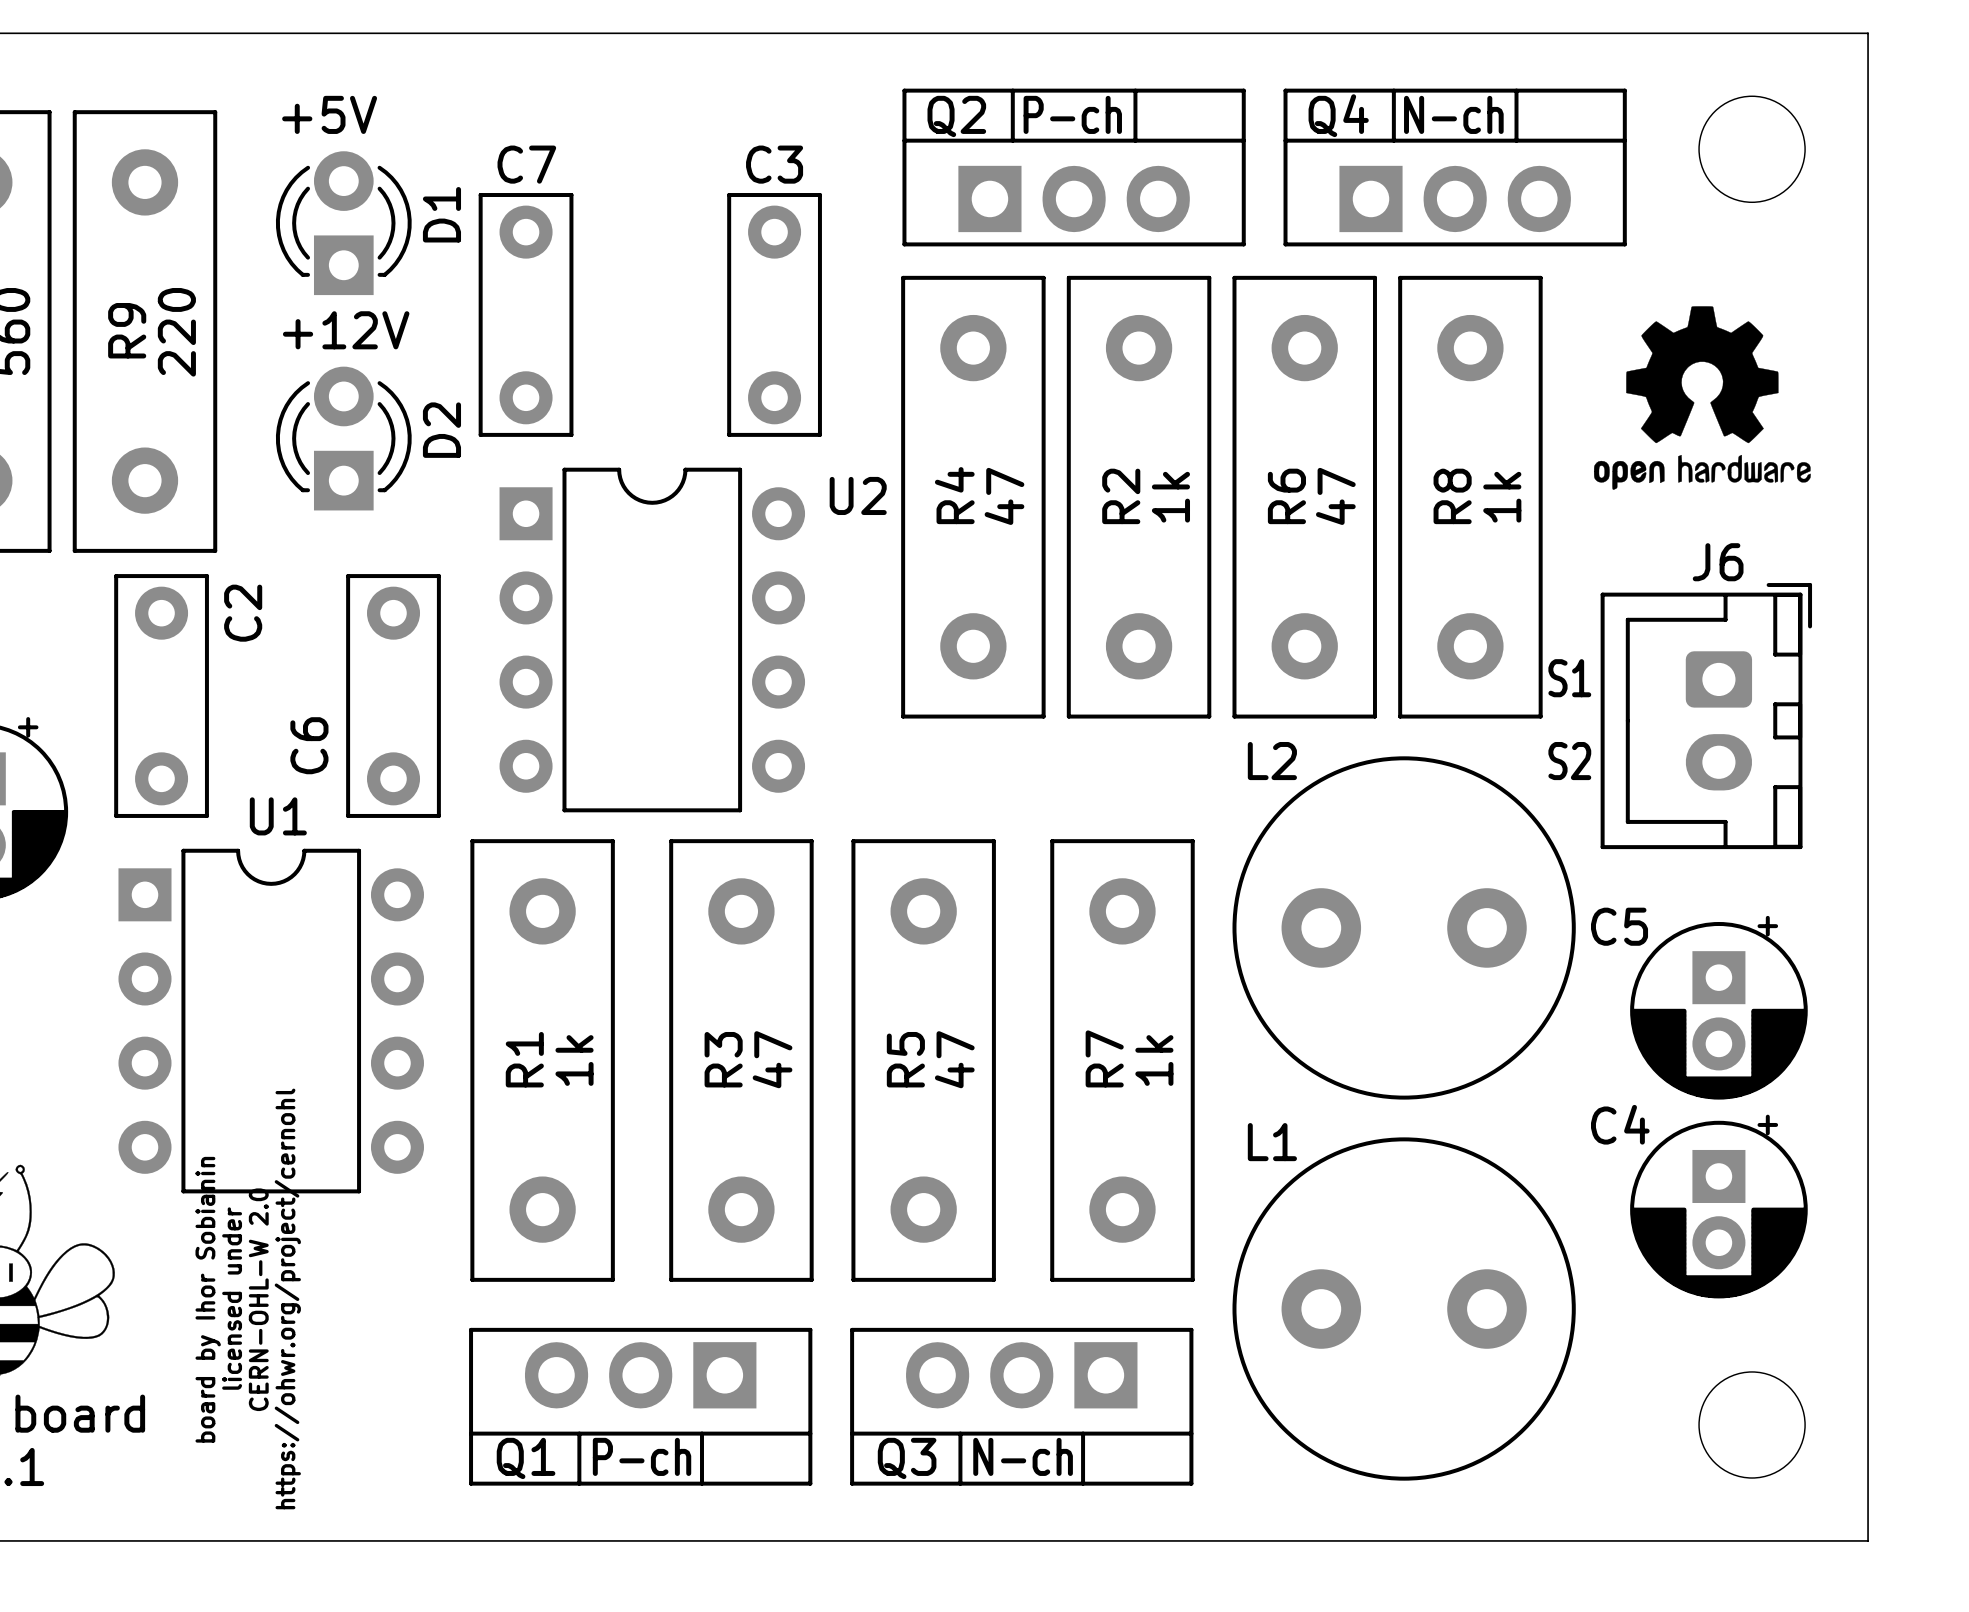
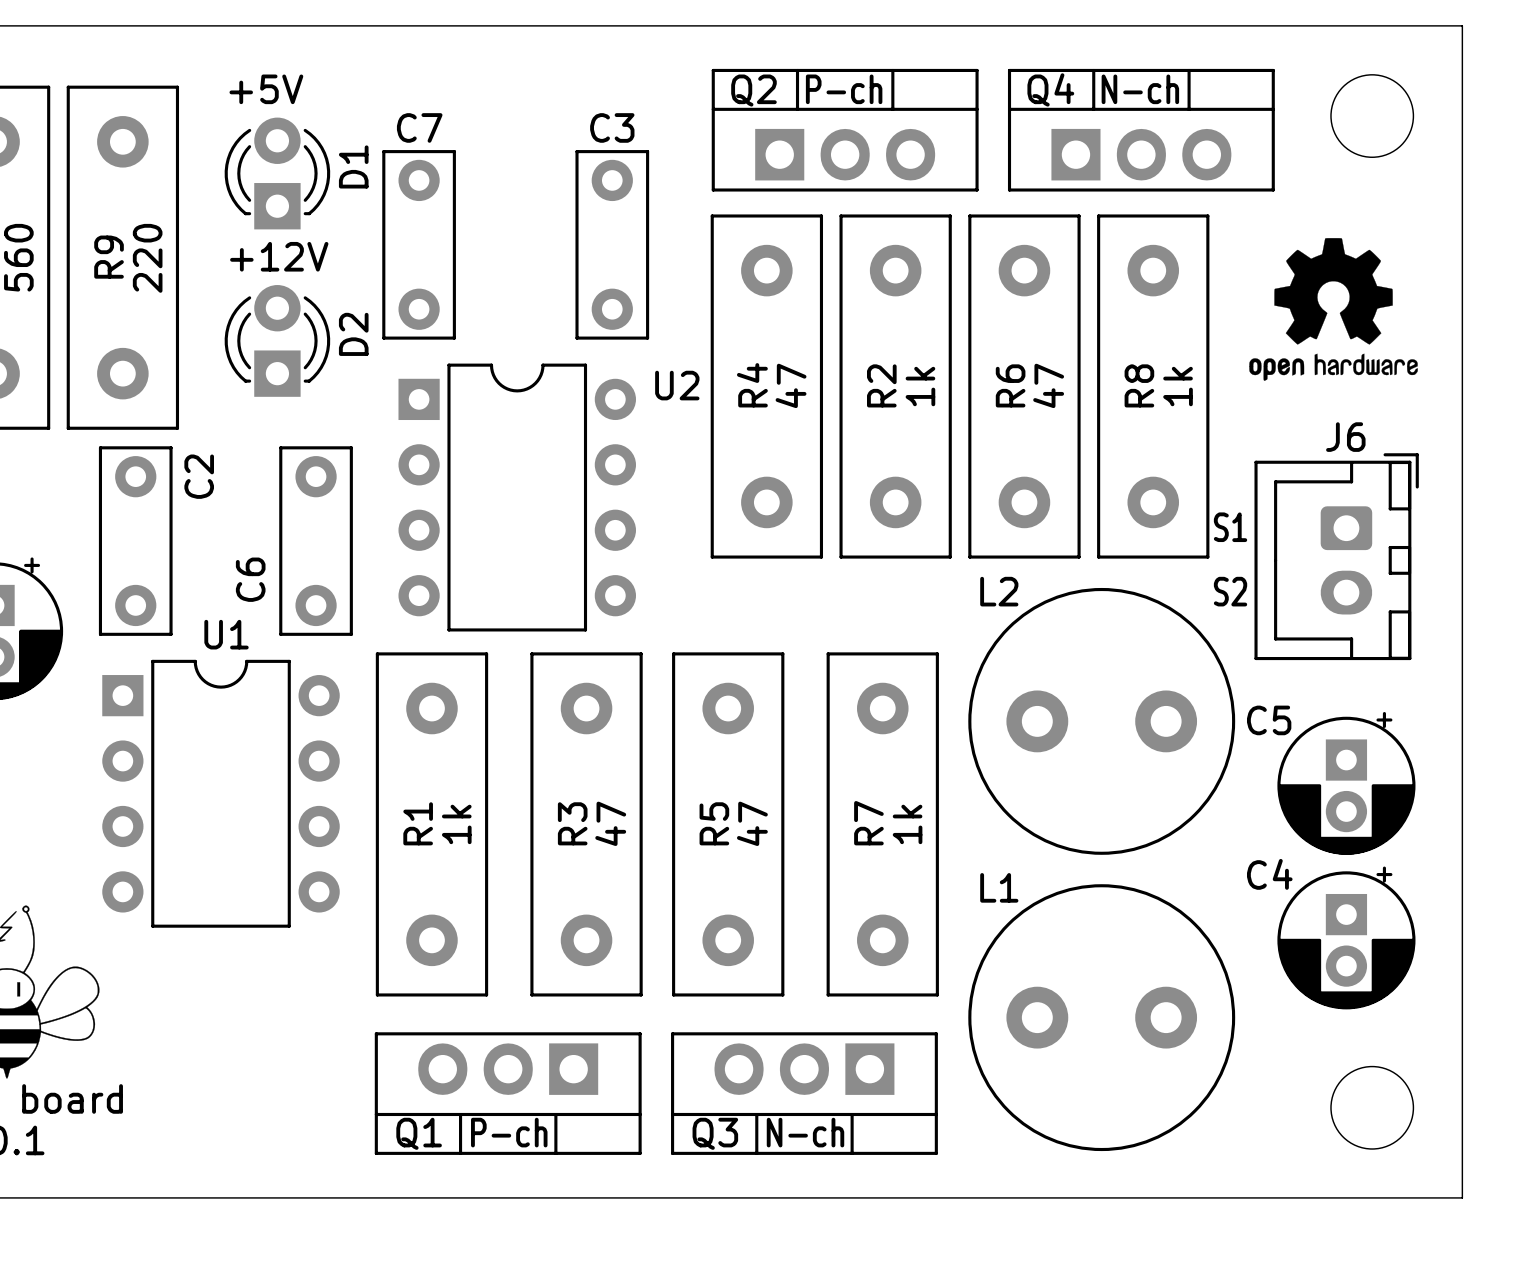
text: licensed under (232, 1298) -> none
text: https://ohwr.org/project/cernohl (287, 1298) -> none
text: board by Ihor Sobianin (208, 1299) -> none
text: CERN-OHL-W 2.0 (258, 1299) -> none

